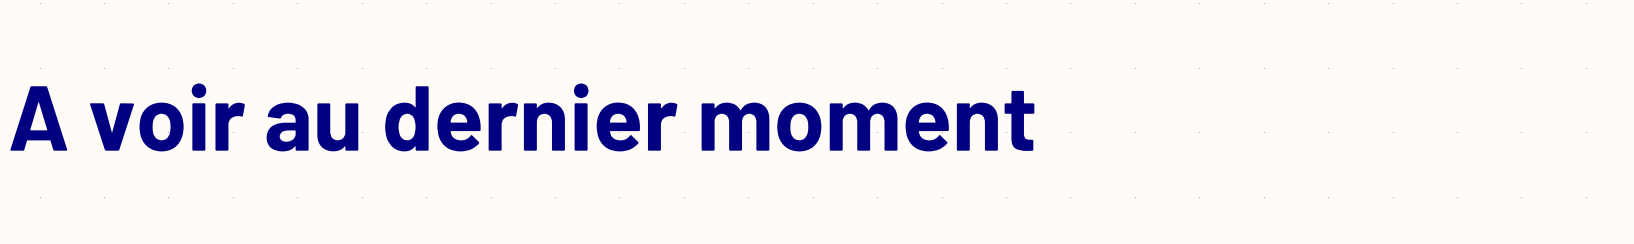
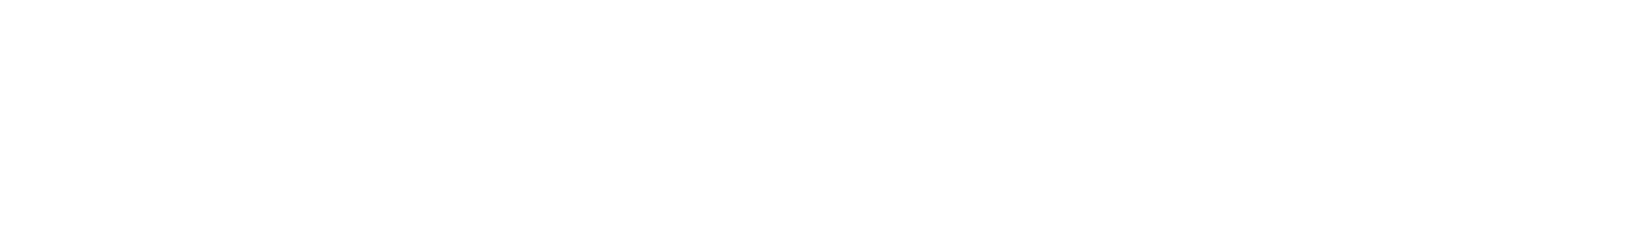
text: A voir au dernier moment (522, 117) -> none

